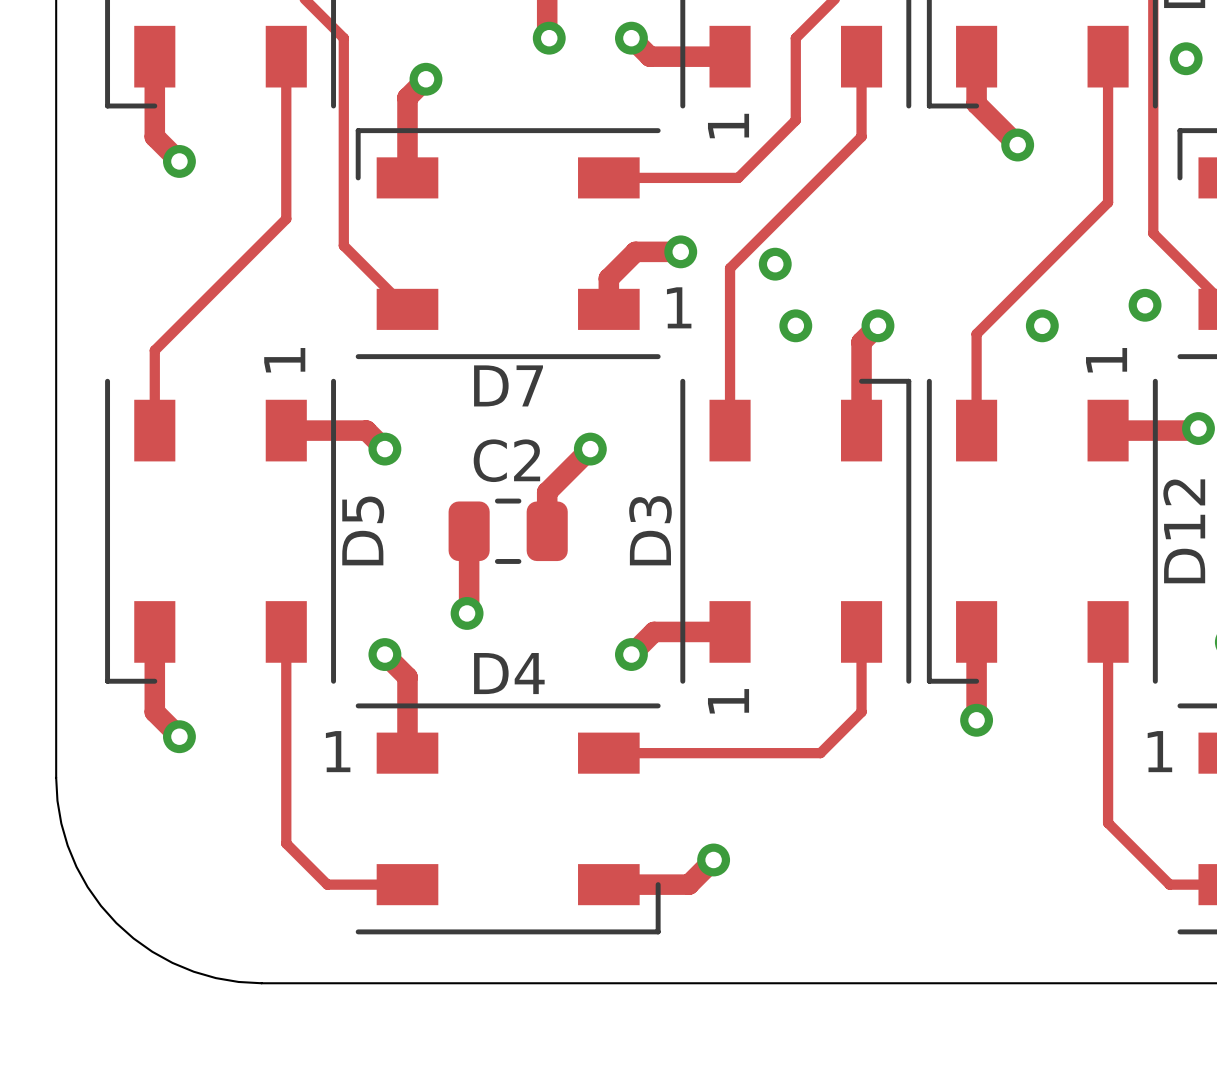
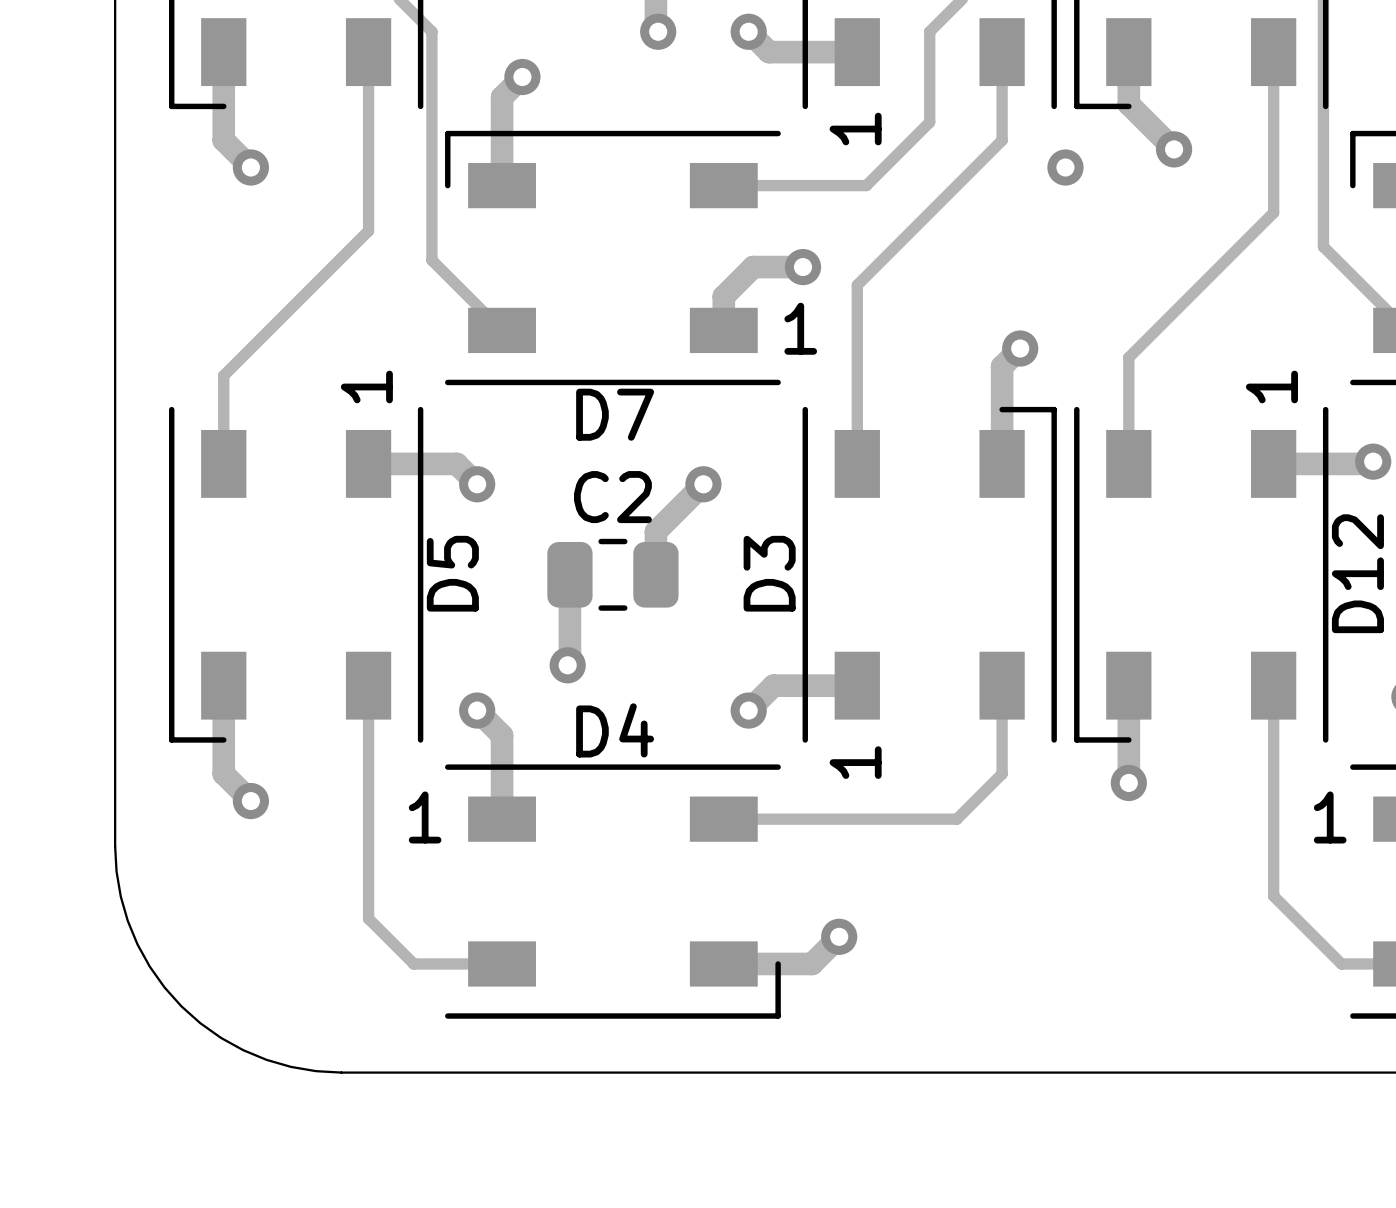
via: (1186, 58) -> none
via: none -> (1065, 167)
via: (775, 264) -> none
via: (1145, 305) -> none
via: (795, 325) -> none
via: (1042, 325) -> none

